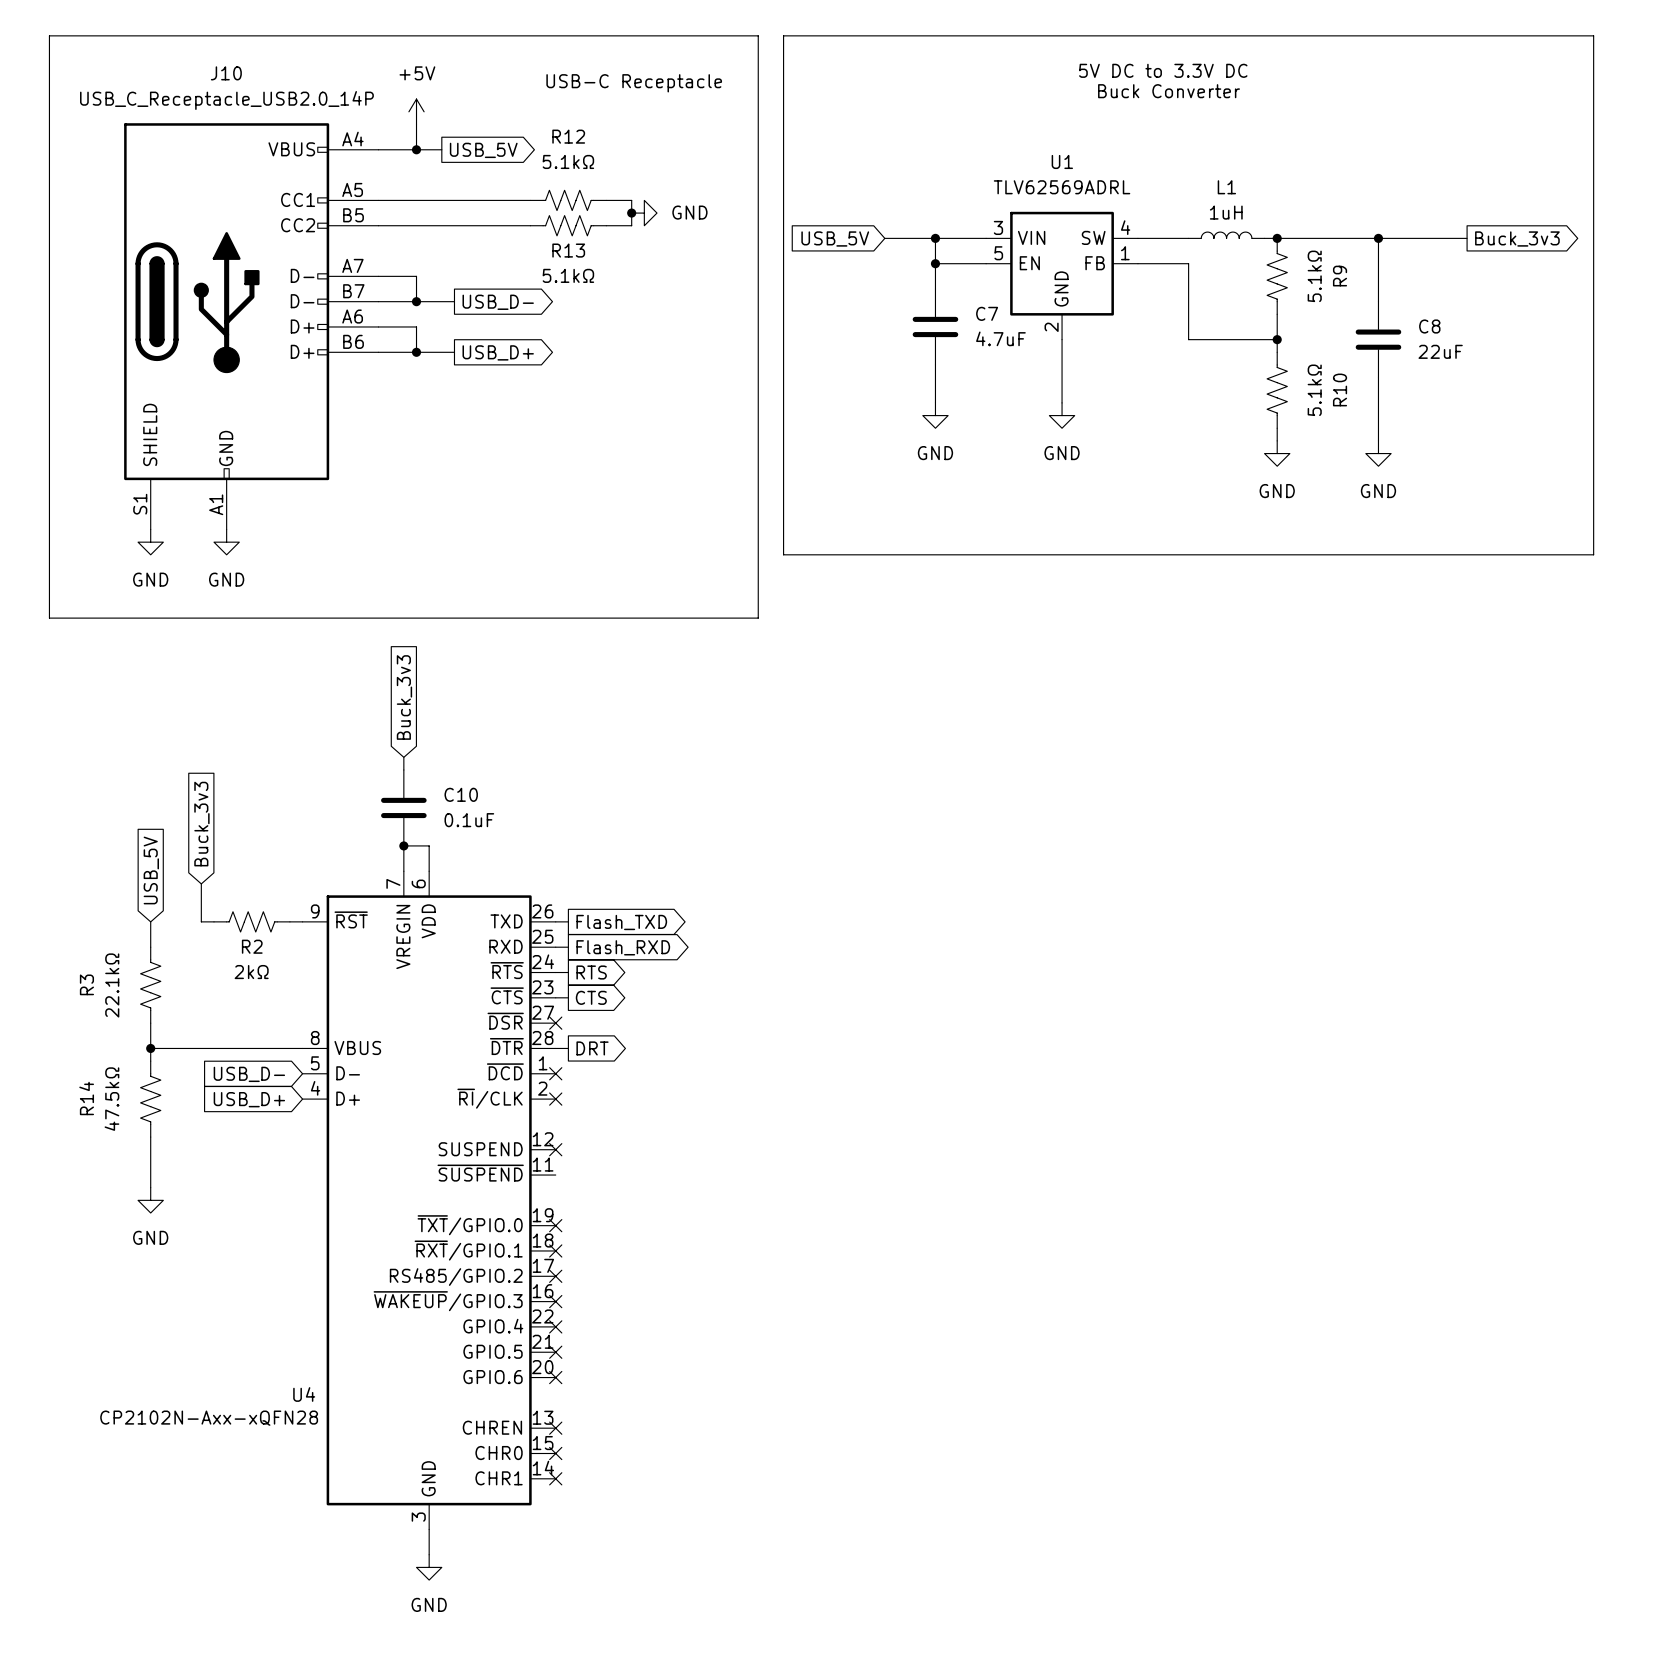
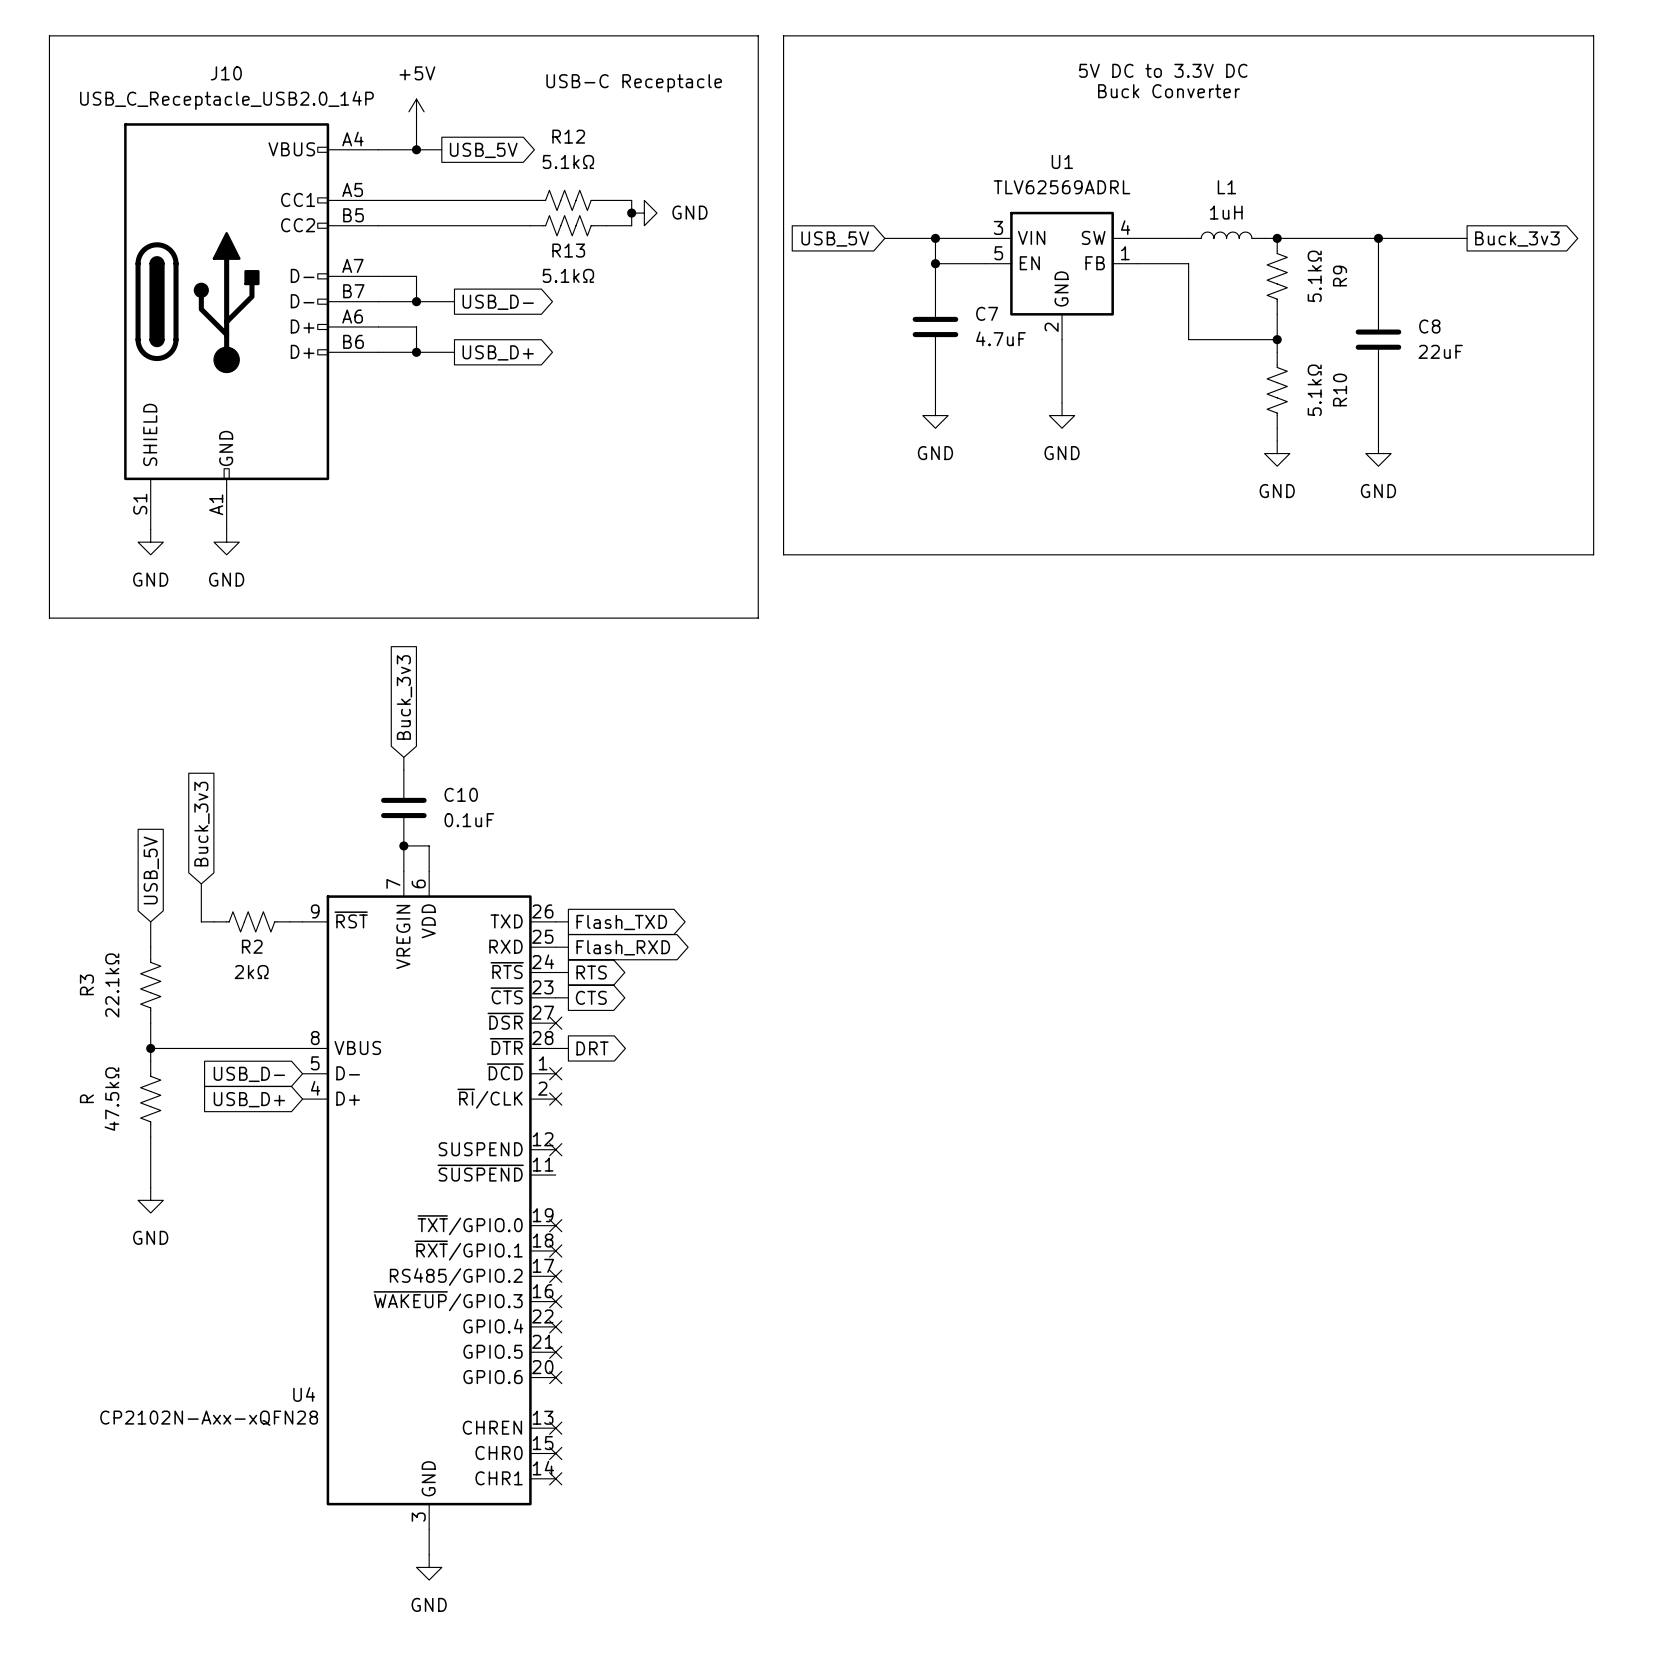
R14 name: R14 (86, 1098) -> R (86, 1098)

